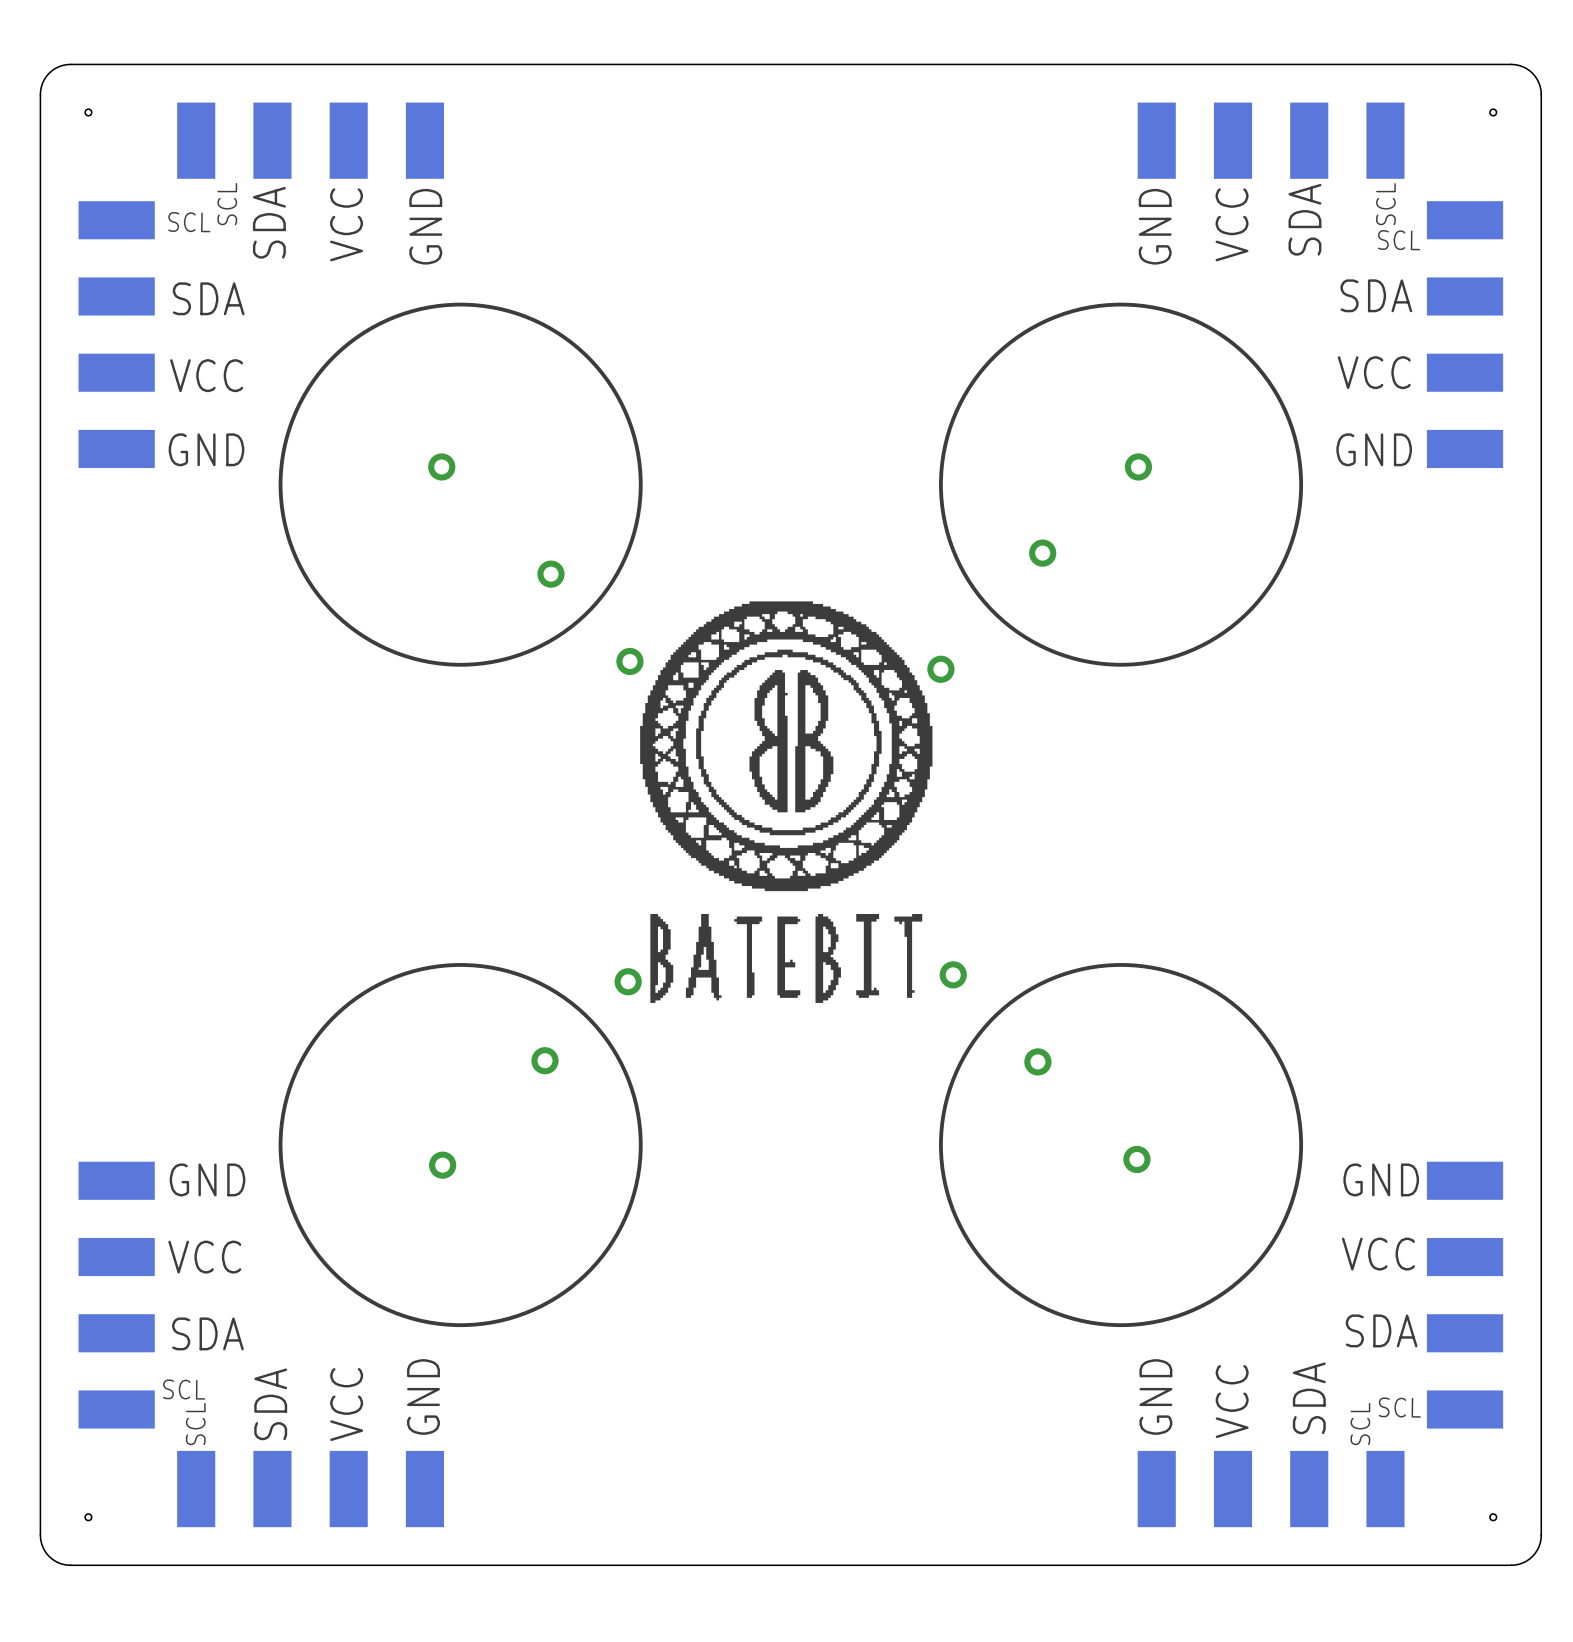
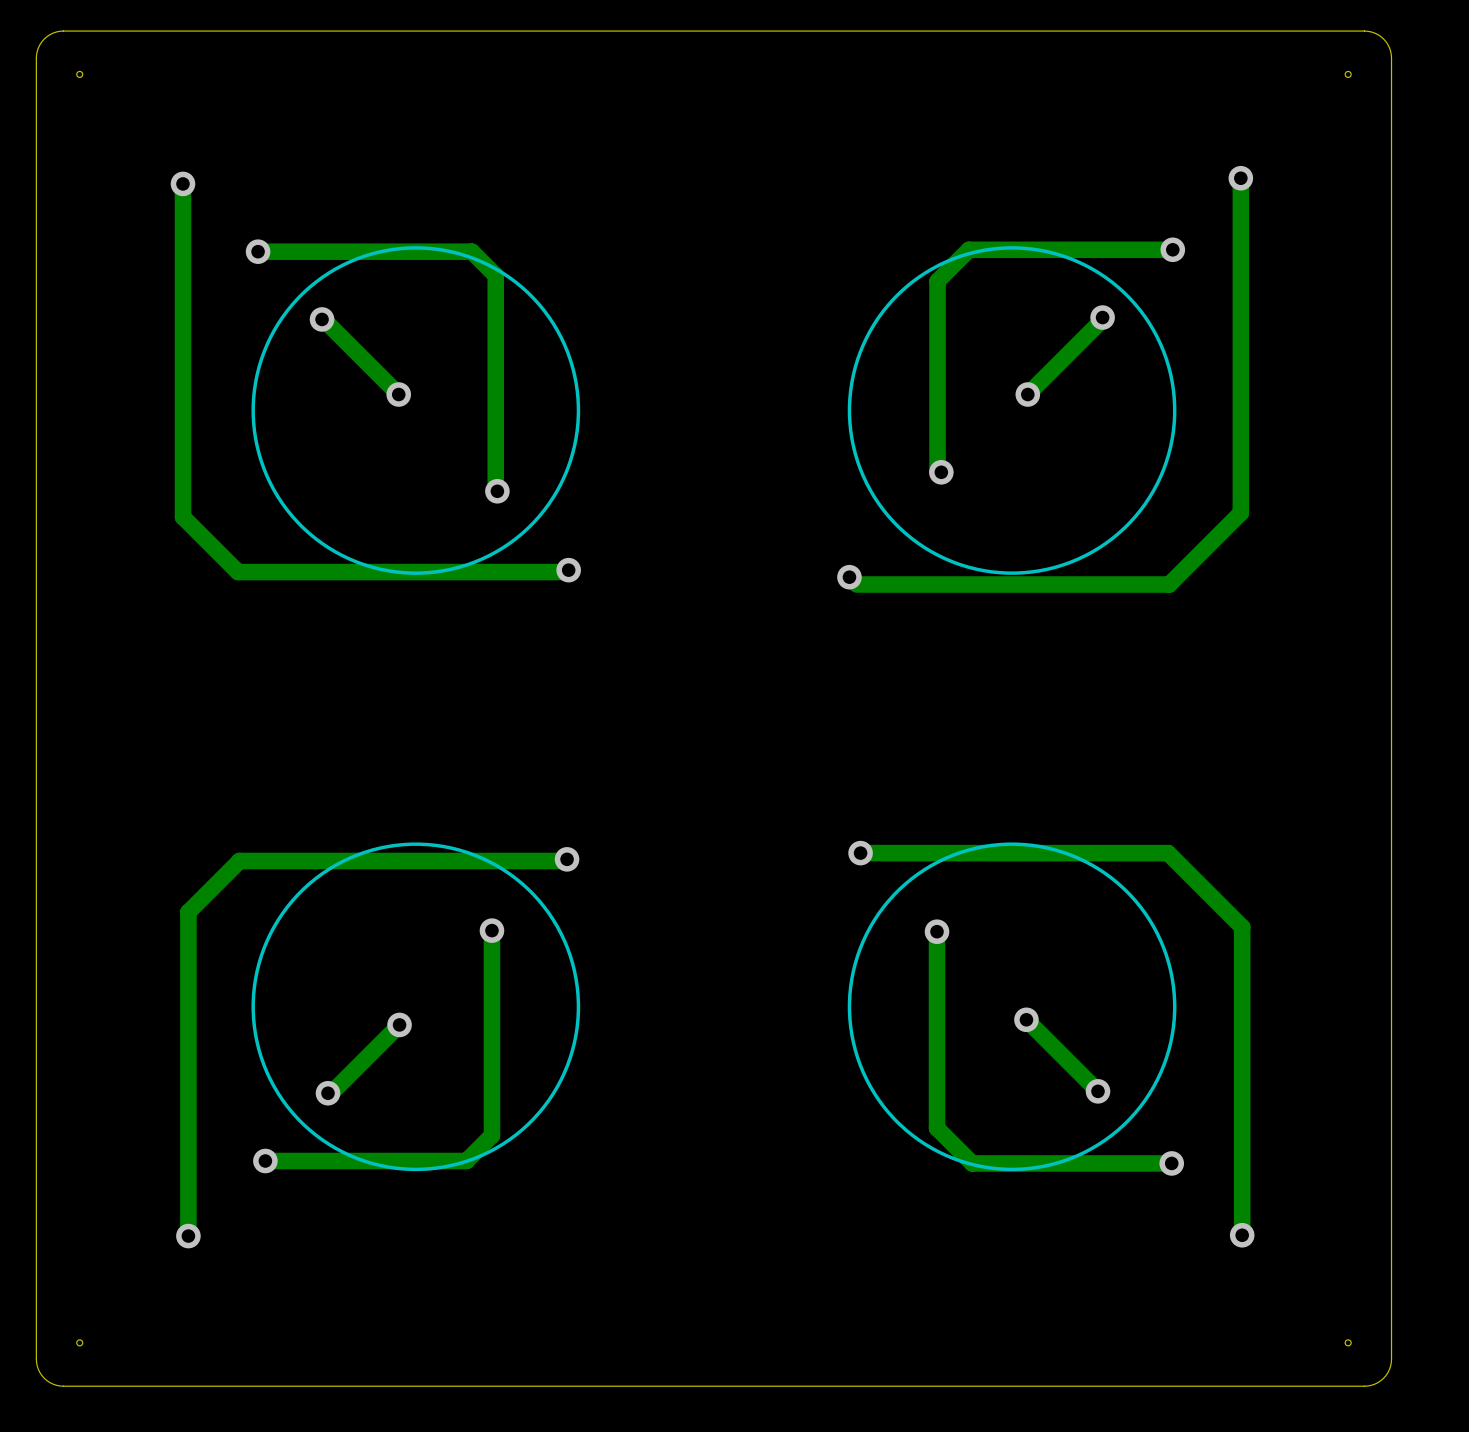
part: (310, 140) -> none
part: (1271, 140) -> none
text: SCL (227, 204) -> none
text: SCL (1385, 204) -> none
text: SDA (1304, 219) -> none
text: SCL (189, 222) -> none
text: SDA (269, 222) -> none
text: VCC (346, 224) -> none
text: VCC (1232, 224) -> none
text: GND (425, 226) -> none
text: GND (1155, 226) -> none
track: none -> (1240, 178) (1240, 512) (1169, 584) (856, 584) (849, 577)
via: none -> (1240, 178)
track: none -> (182, 183) (182, 517) (238, 572) (566, 572) (568, 570)
via: none -> (182, 183)
text: SCL (1398, 240) -> none
text: SDA (1376, 295) -> none
text: SDA (208, 298) -> none
track: none -> (1172, 249) (968, 249) (937, 281) (937, 468) (941, 472)
via: none -> (1172, 249)
track: none -> (258, 251) (471, 251) (495, 275) (495, 489) (497, 491)
via: none -> (258, 251)
part: (116, 334) -> none
part: (1465, 334) -> none
text: VCC (1374, 372) -> none
text: VCC (206, 375) -> none
track: none -> (1102, 317) (1102, 319) (1027, 394)
via: none -> (1102, 317)
track: none -> (322, 319) (398, 394)
via: none -> (322, 319)
text: GND (206, 449) -> none
text: GND (1374, 449) -> none
drawing: [640, 601, 933, 1003] -> none
track: none -> (860, 853) (1168, 853) (1242, 927) (1242, 1235)
track: none -> (567, 859) (565, 860) (239, 860) (188, 912) (188, 1236)
track: none -> (491, 930) (491, 1135) (466, 1161) (265, 1161)
track: none -> (937, 931) (937, 1128) (972, 1163) (1171, 1163)
track: none -> (1026, 1019) (1098, 1091)
track: none -> (399, 1024) (331, 1093) (328, 1093)
text: GND (207, 1179) -> none
text: GND (1381, 1179) -> none
via: none -> (1098, 1091)
via: none -> (328, 1093)
text: VCC (1378, 1254) -> none
text: VCC (204, 1257) -> none
part: (116, 1295) -> none
part: (1465, 1295) -> none
via: none -> (265, 1161)
via: none -> (1171, 1163)
text: SDA (1381, 1330) -> none
text: SDA (207, 1333) -> none
text: SCL (184, 1389) -> none
text: GND (423, 1396) -> none
text: GND (1155, 1396) -> none
text: SDA (1309, 1398) -> none
via: none -> (1242, 1235)
via: none -> (188, 1236)
text: VCC (1232, 1401) -> none
text: SDA (270, 1404) -> none
text: VCC (346, 1404) -> none
text: SCL (1399, 1407) -> none
text: SCL (195, 1424) -> none
text: SCL (1360, 1424) -> none
part: (310, 1489) -> none
part: (1271, 1489) -> none

